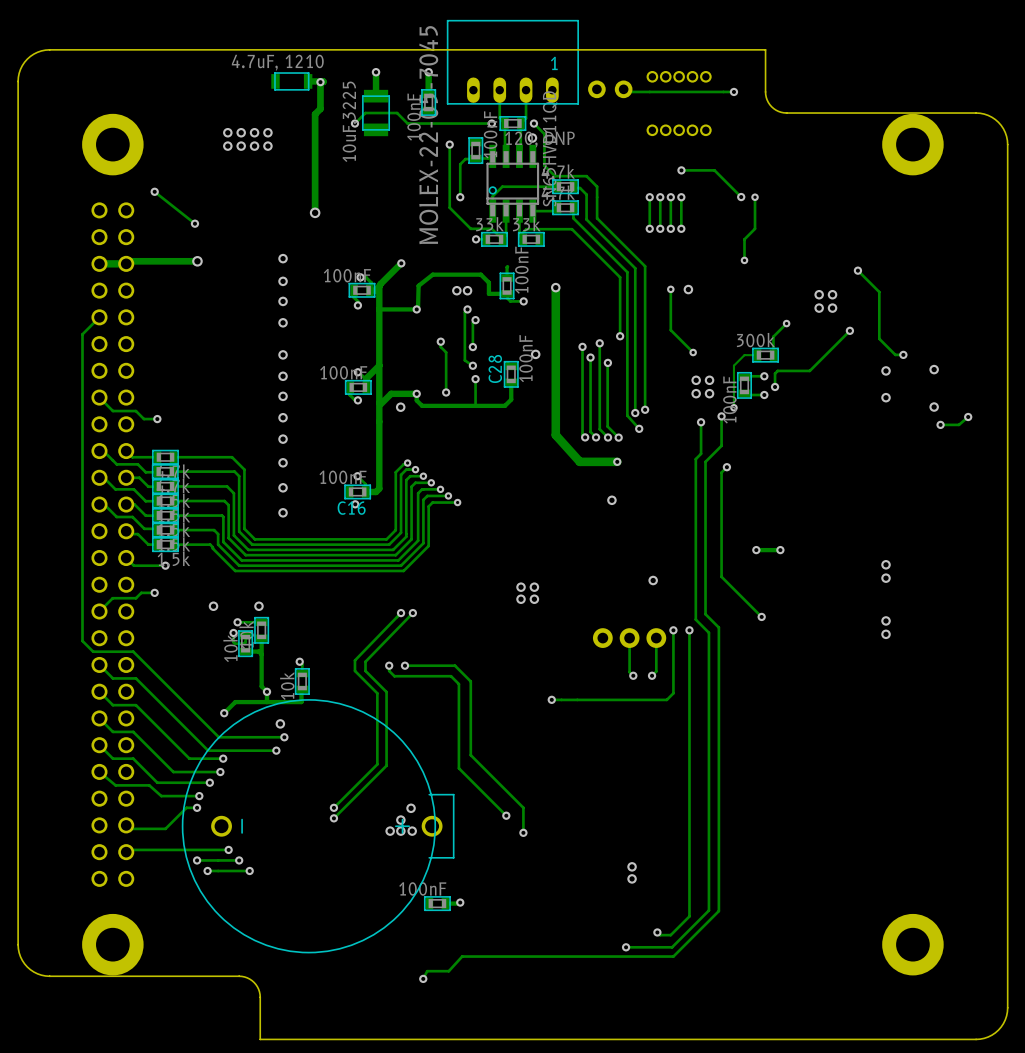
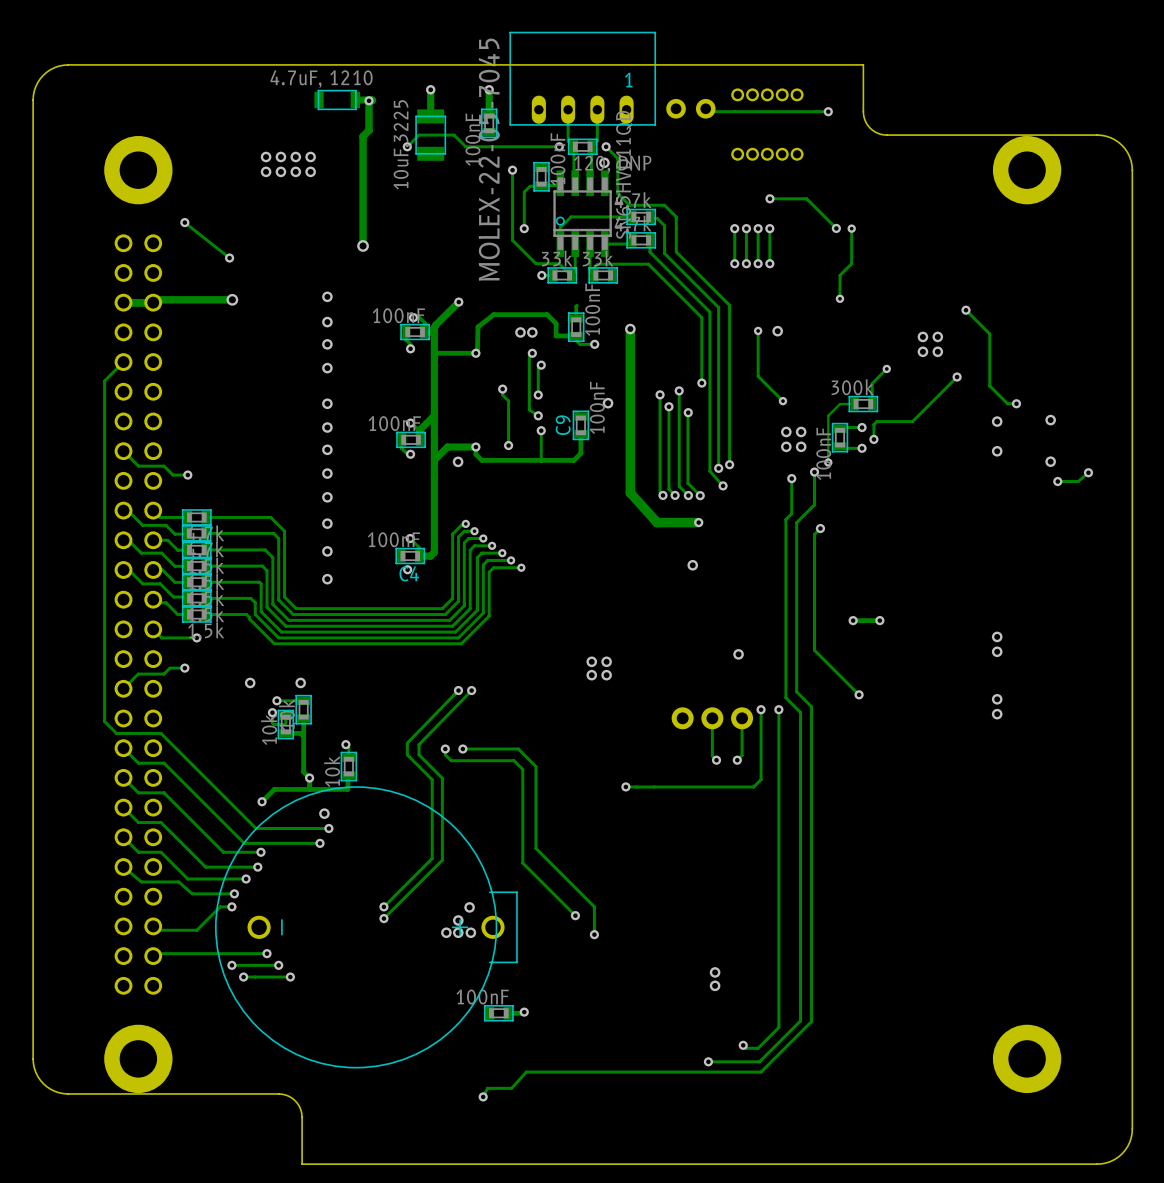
C28 name: C28 (495, 368) -> C9 (563, 425)
C16 name: C16 (351, 508) -> C4 (409, 573)

